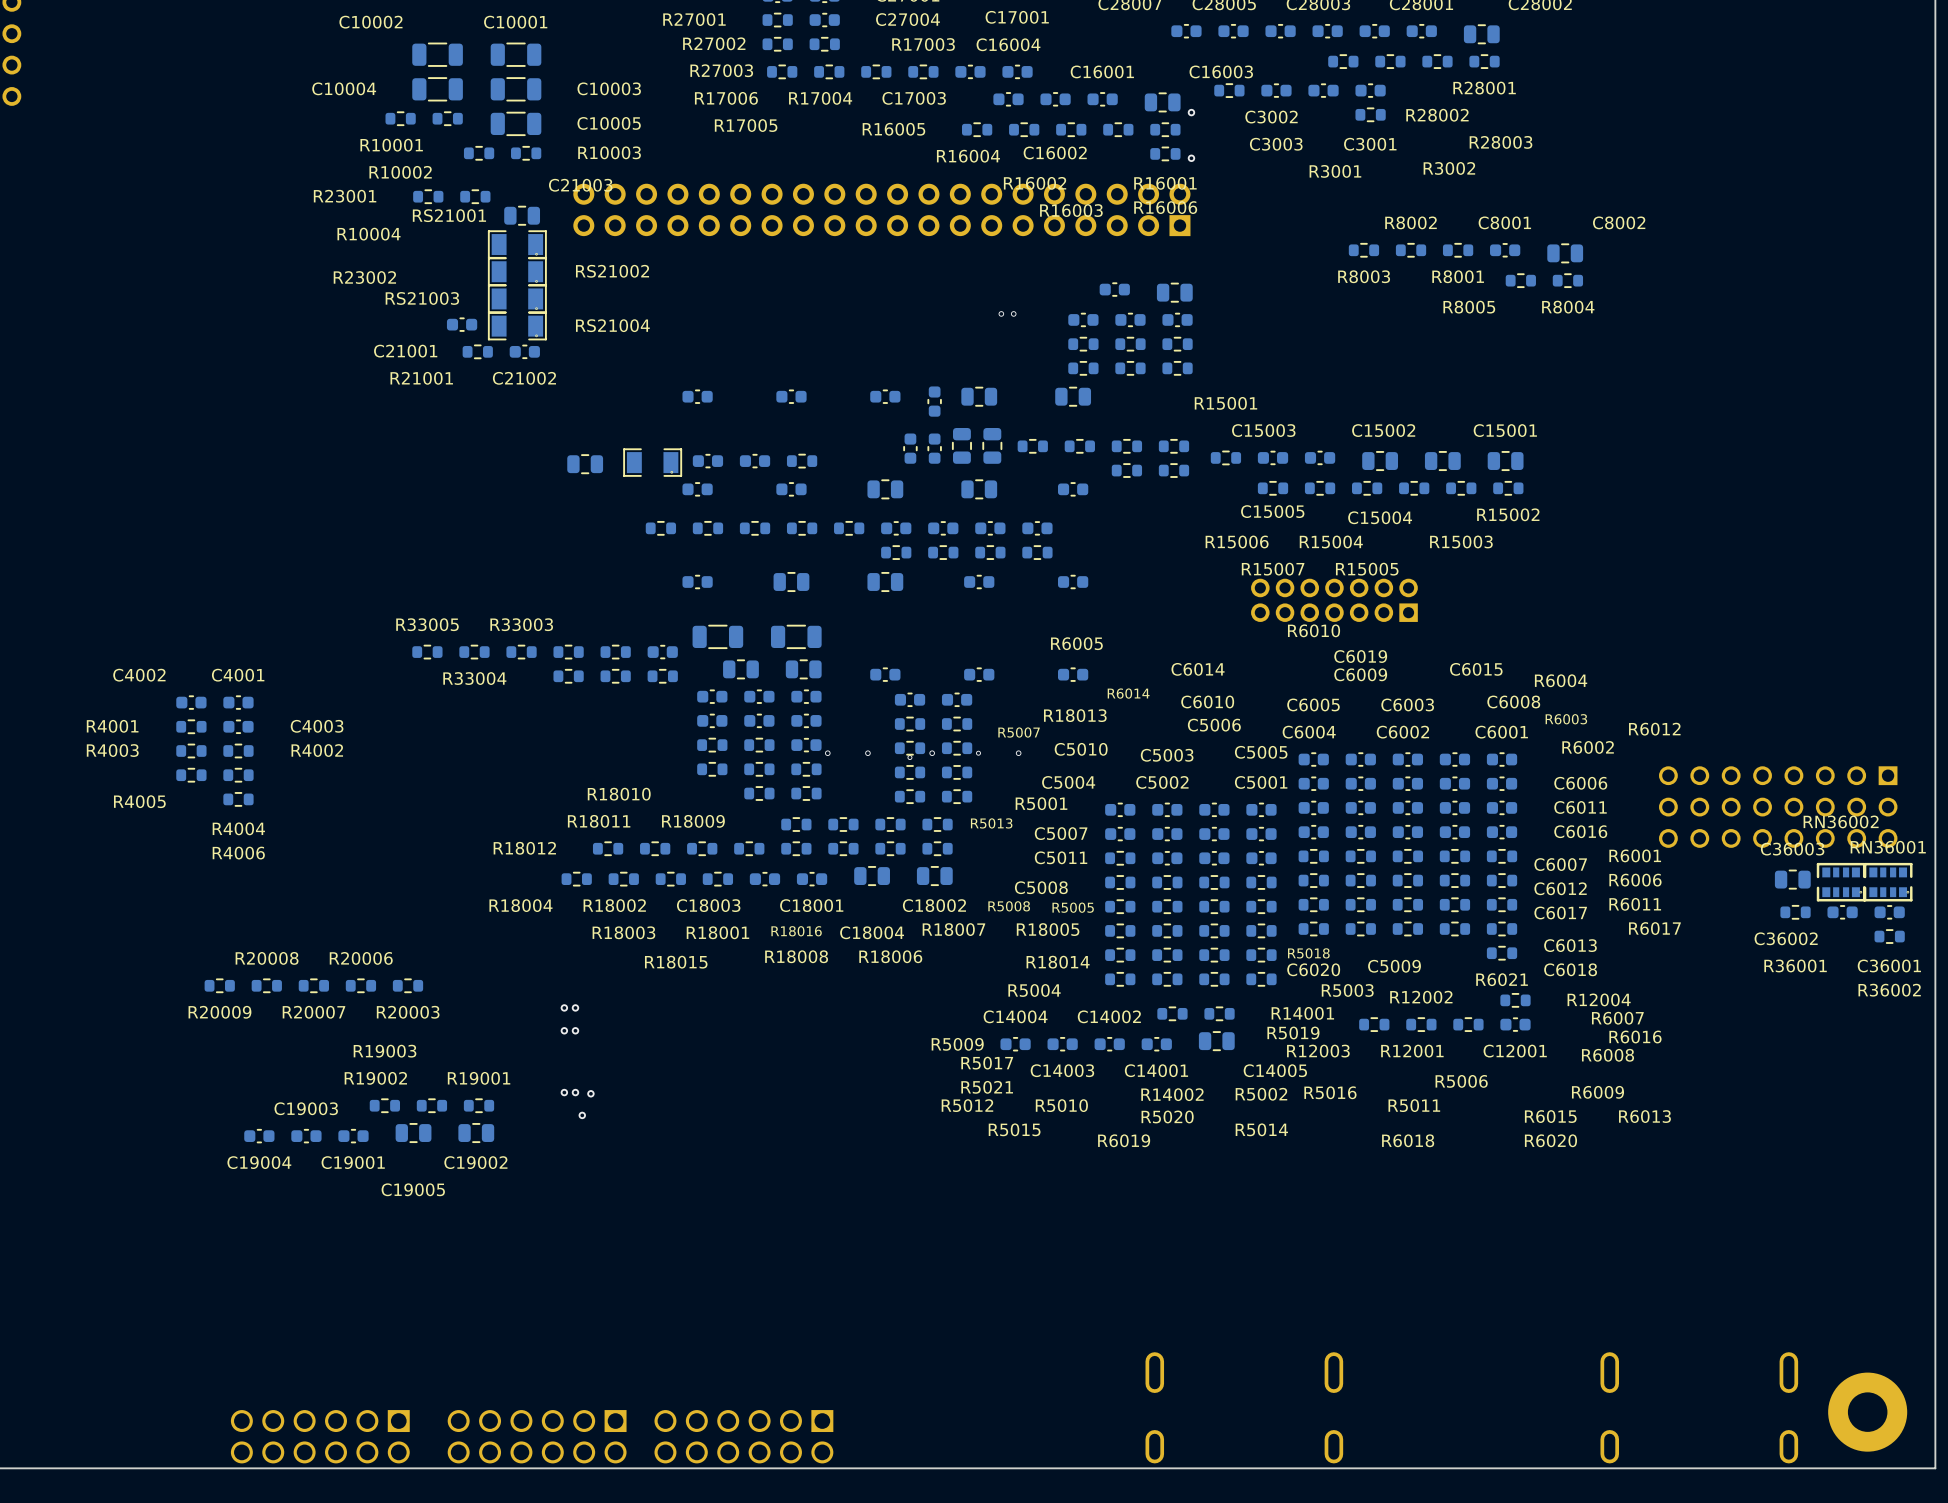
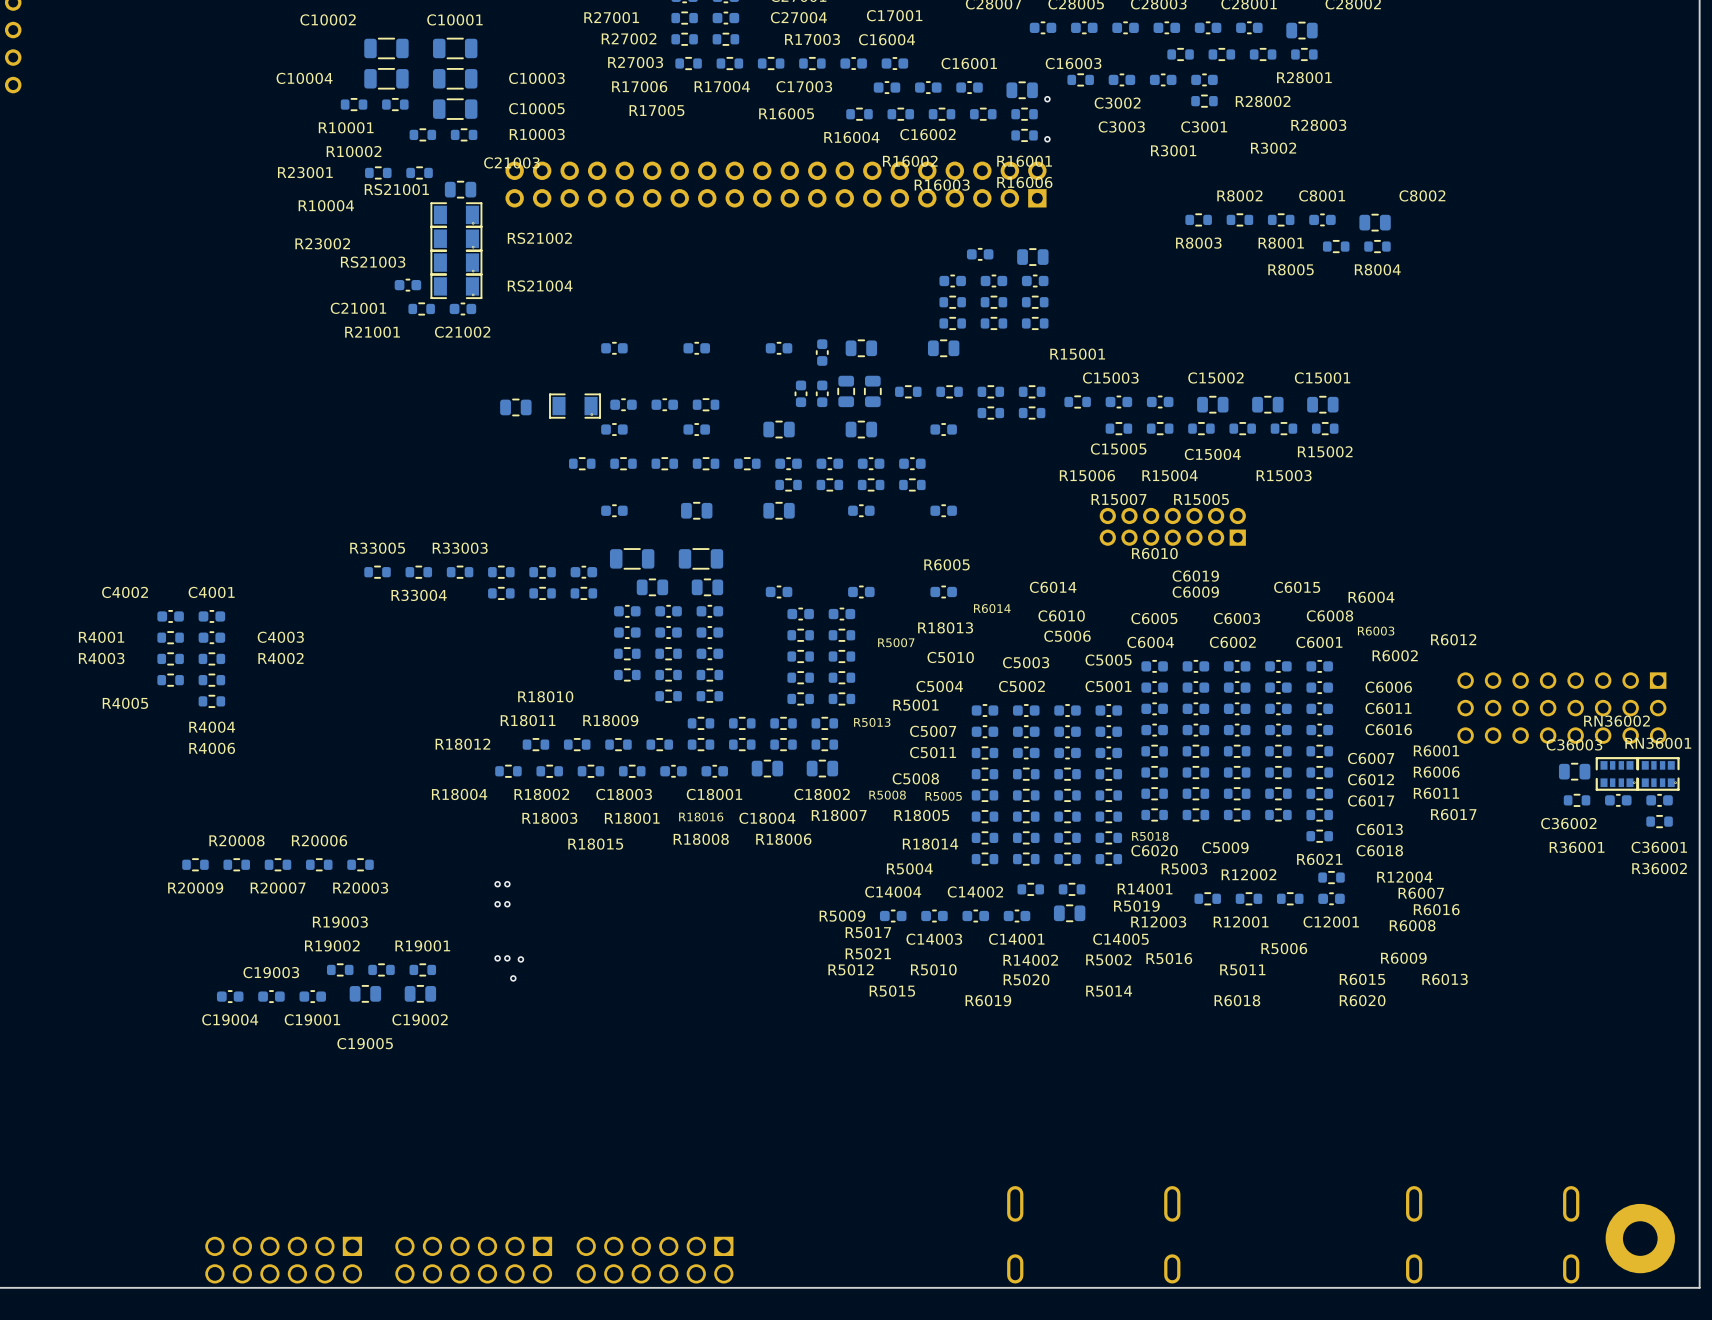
via: (1001, 313) -> none
via: (1013, 313) -> none
via: (827, 753) -> none
via: (867, 753) -> none
via: (932, 753) -> none
via: (978, 753) -> none
via: (1018, 753) -> none
via: (909, 757) -> none

